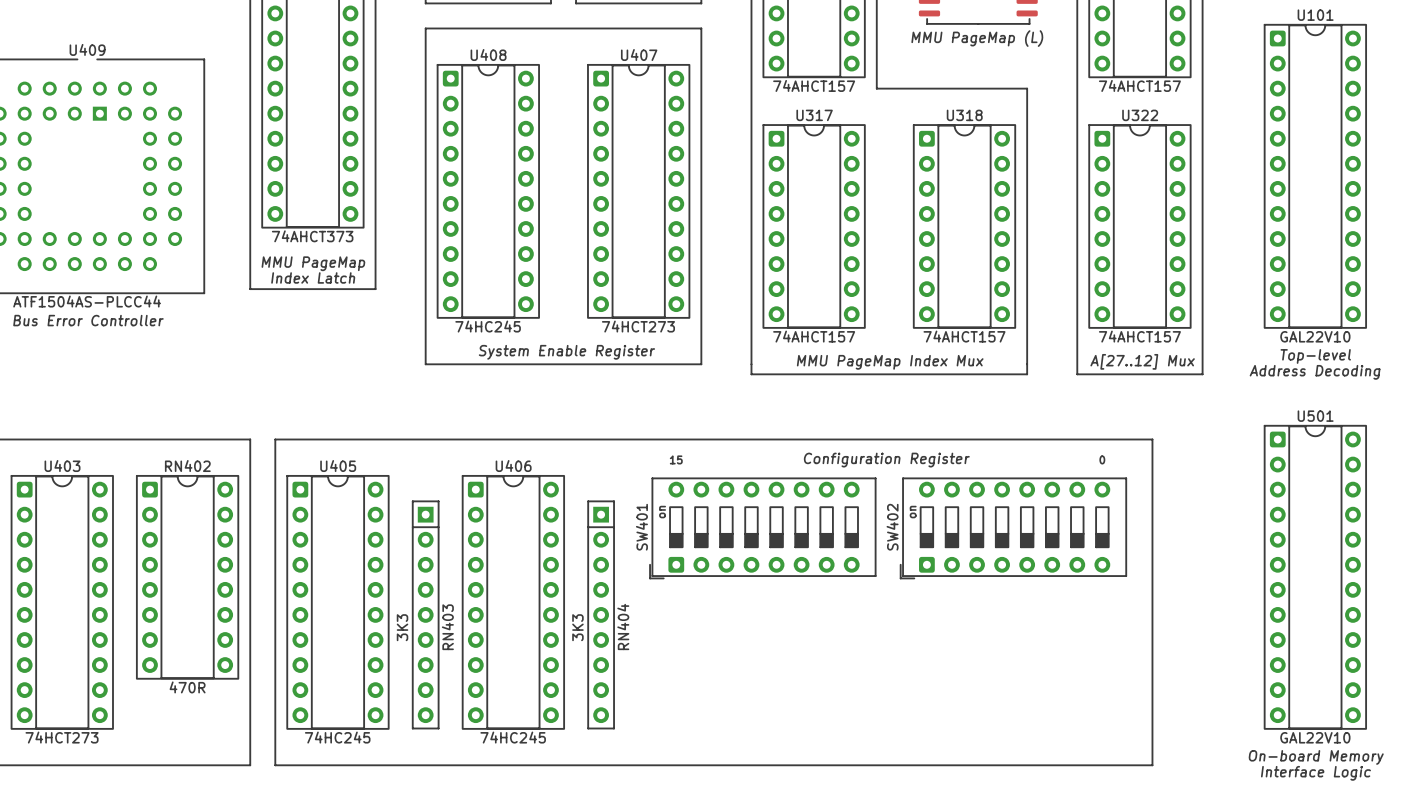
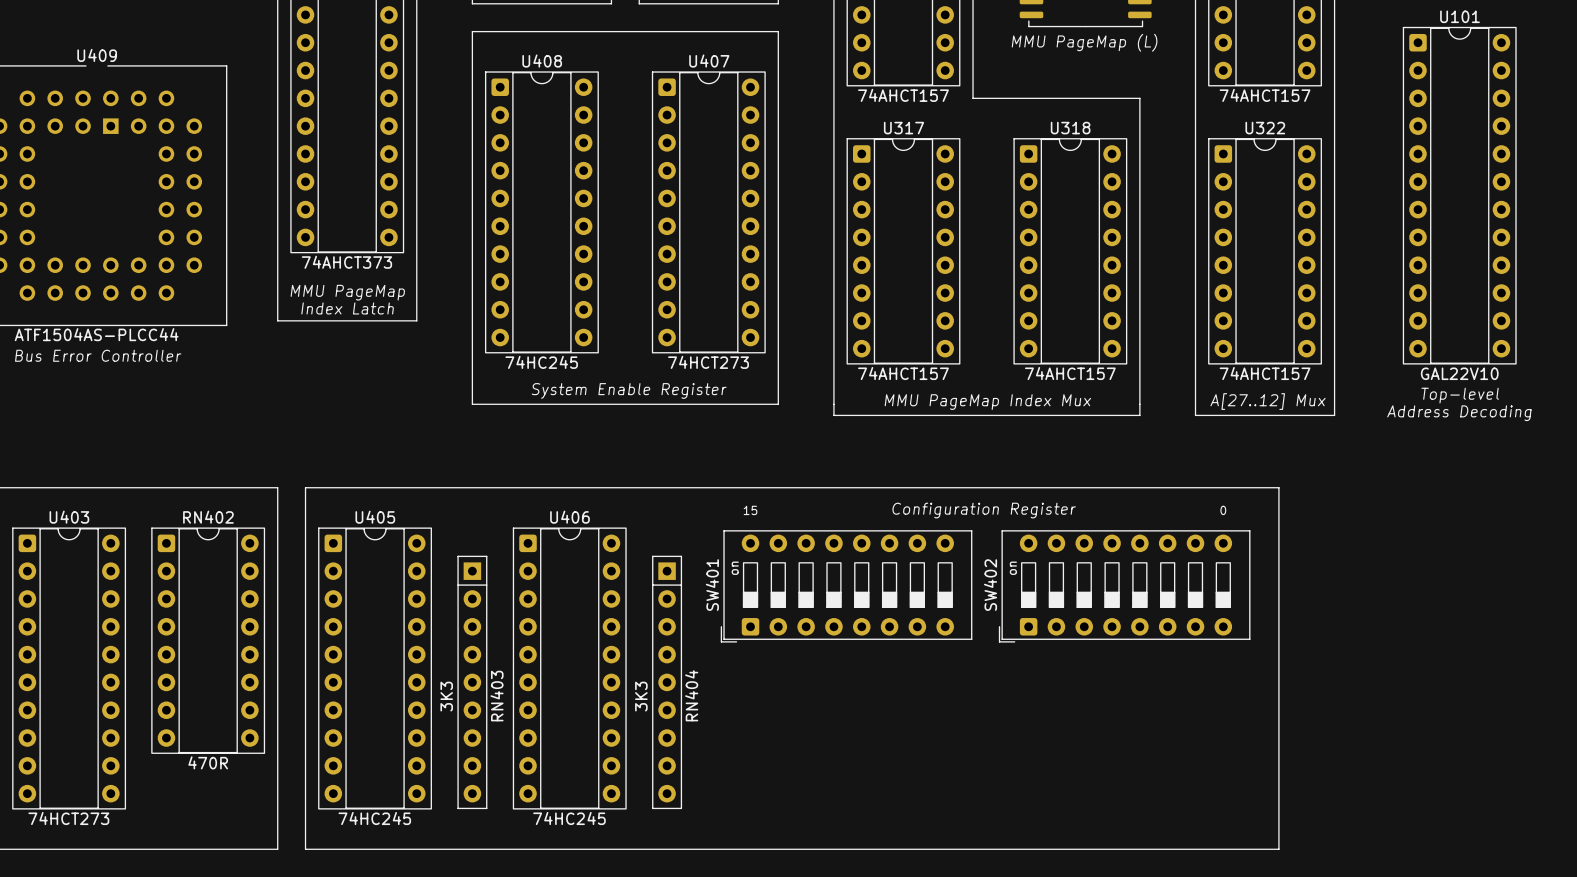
U501: GAL22V10 (1315, 577) -> none
text: On-board Memory (1316, 757) -> none
text: Interface Logic (1315, 773) -> none

